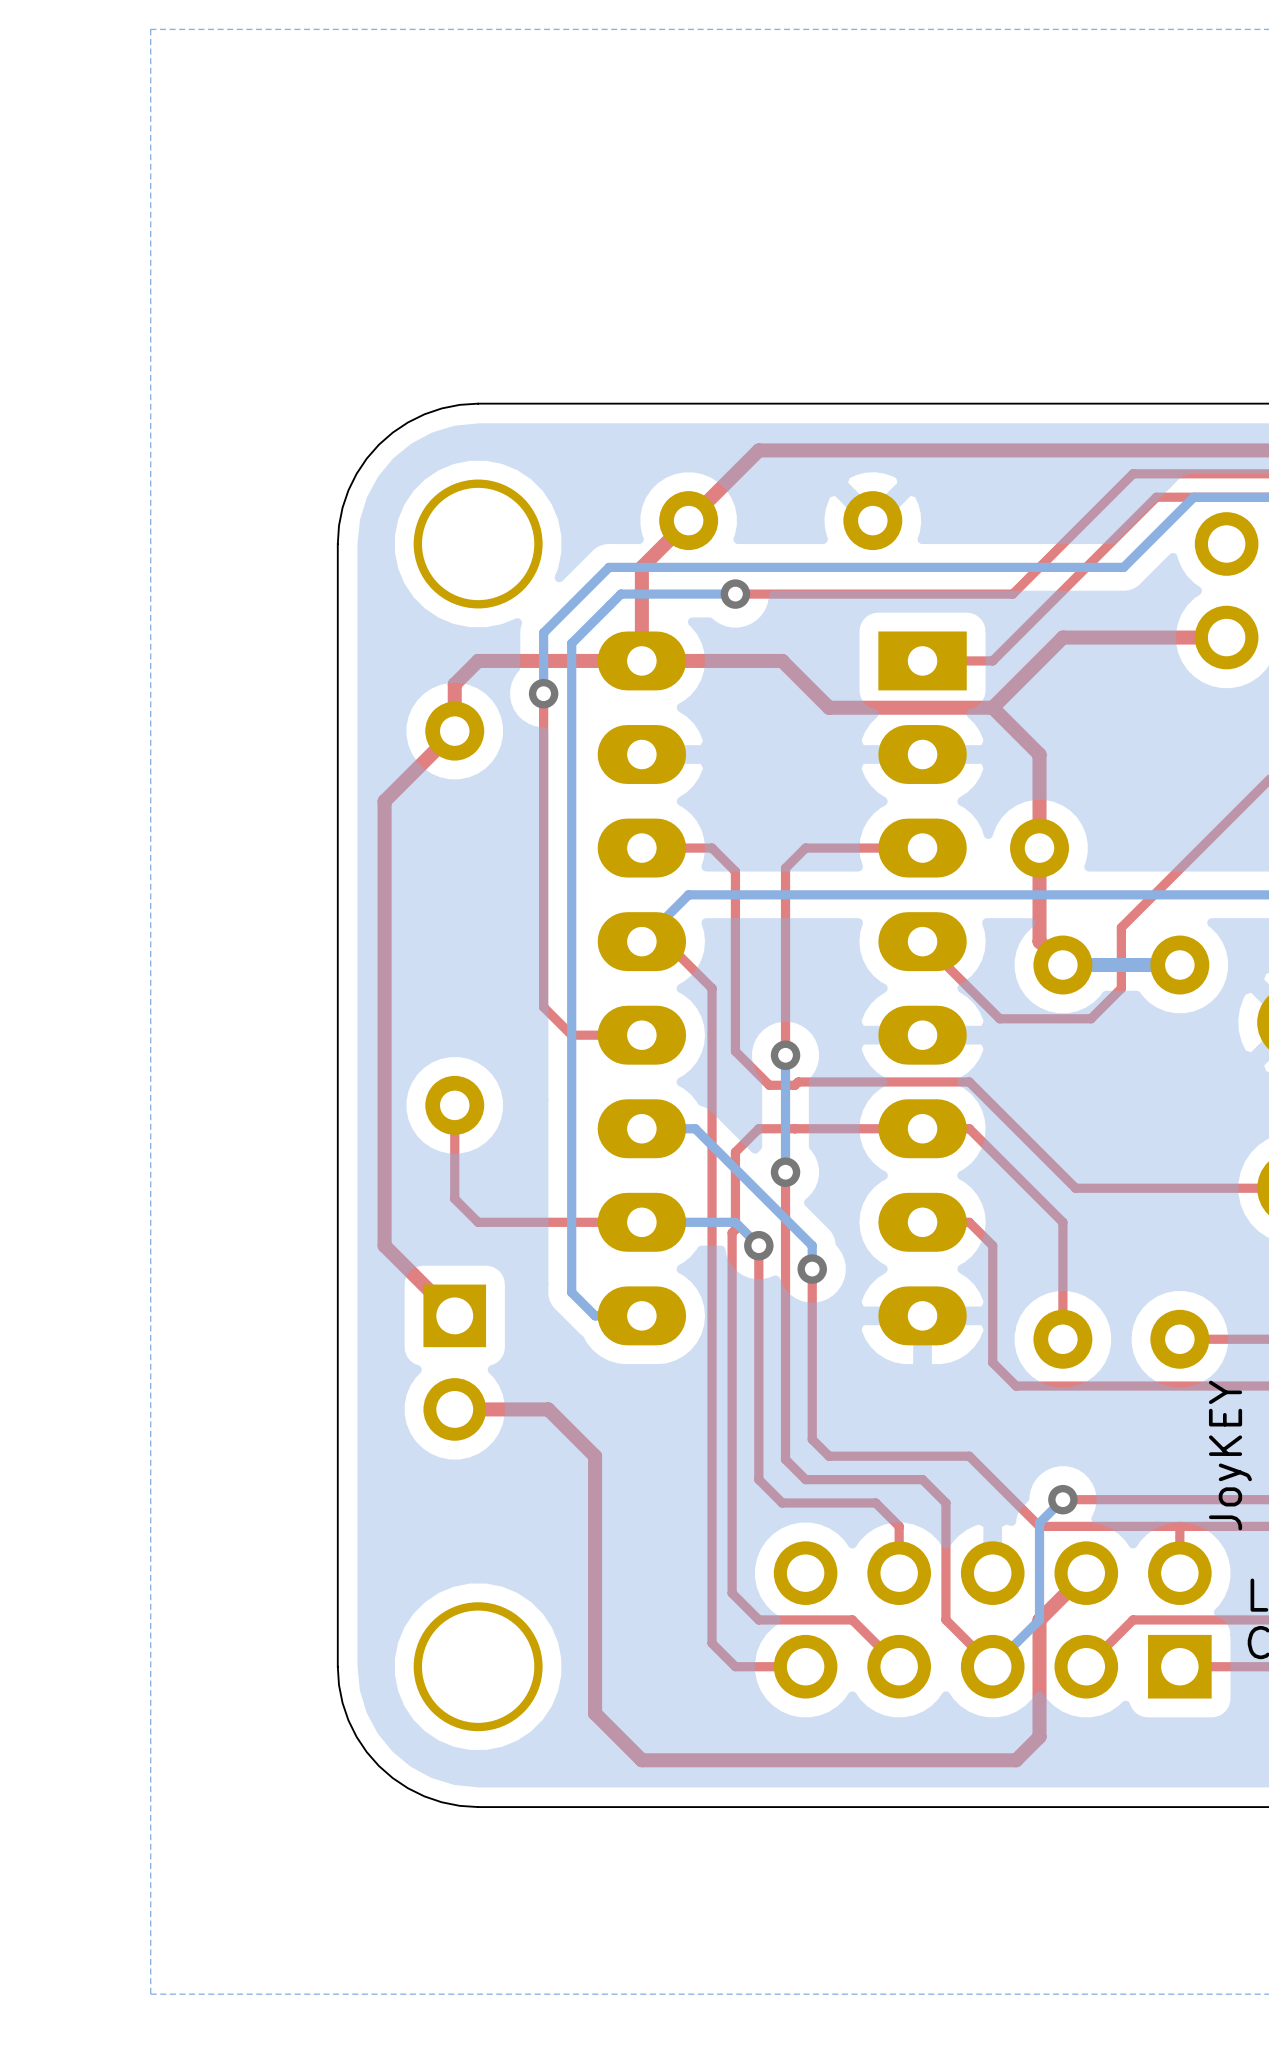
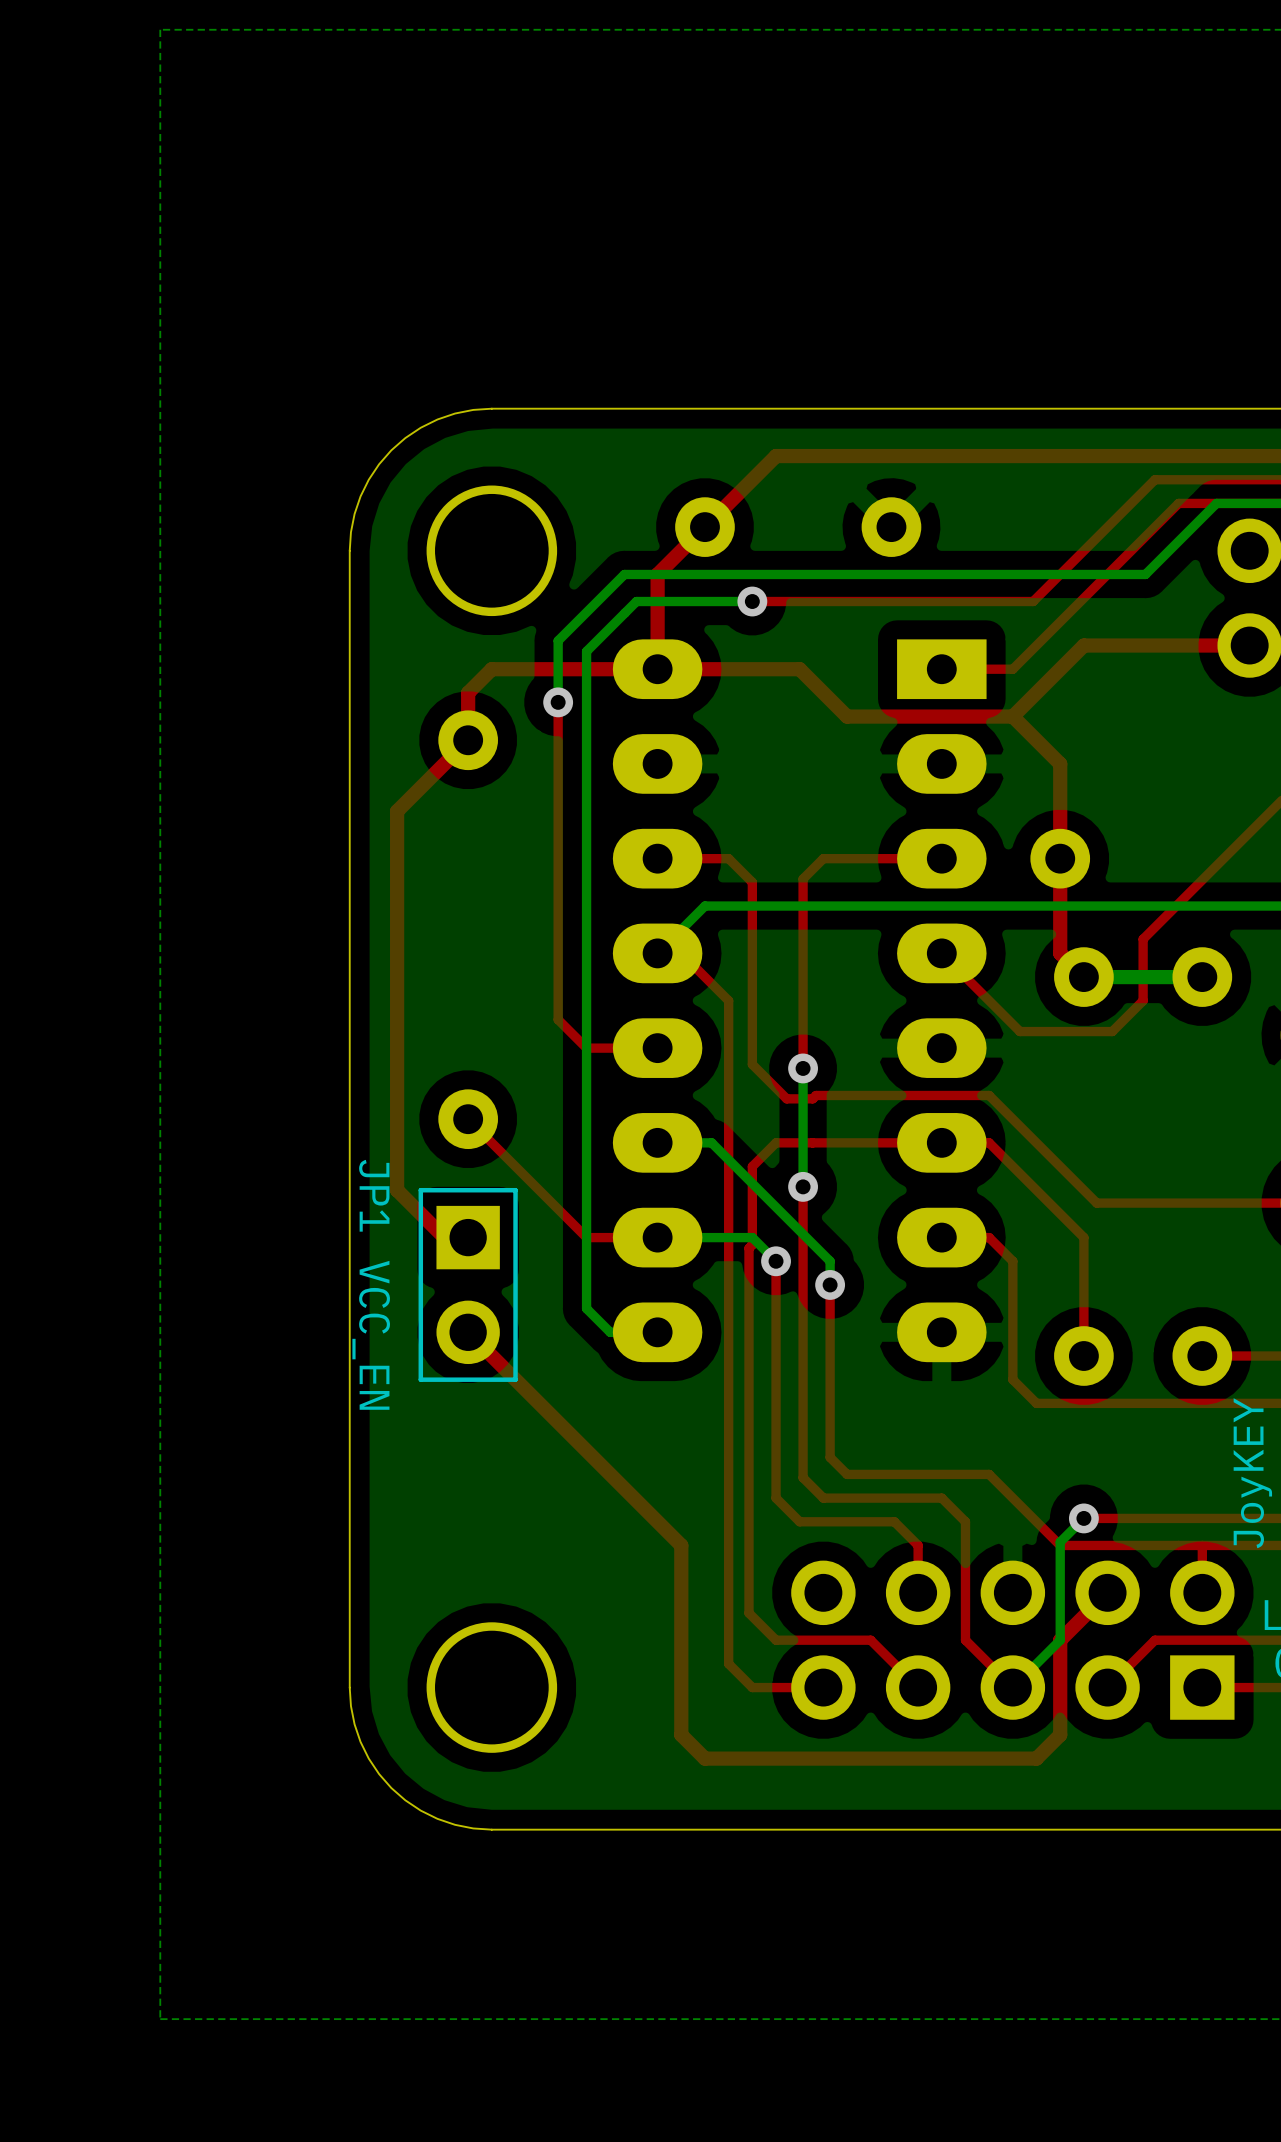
top track: (454, 1105) (454, 1198) (478, 1222) (571, 1222) -> (468, 1119) (586, 1237)
top track: (384, 1175) (384, 1245) (454, 1315) -> (397, 1190) (444, 1237) (468, 1237)
line: none -> (515, 1190) (515, 1379) (420, 1379) (420, 1190) (515, 1190)
text: none -> JP1 VCC_EN (371, 1284)
part position: (454, 1362) -> (468, 1284)
top track: (548, 1409) (454, 1409) -> (562, 1427) (468, 1332)
top track: (595, 1456) (595, 1713) (641, 1760) (1016, 1760) (1039, 1736) (1039, 1713) -> (610, 1474) (681, 1545) (681, 1734) (704, 1758) (1036, 1758) (1060, 1734)

